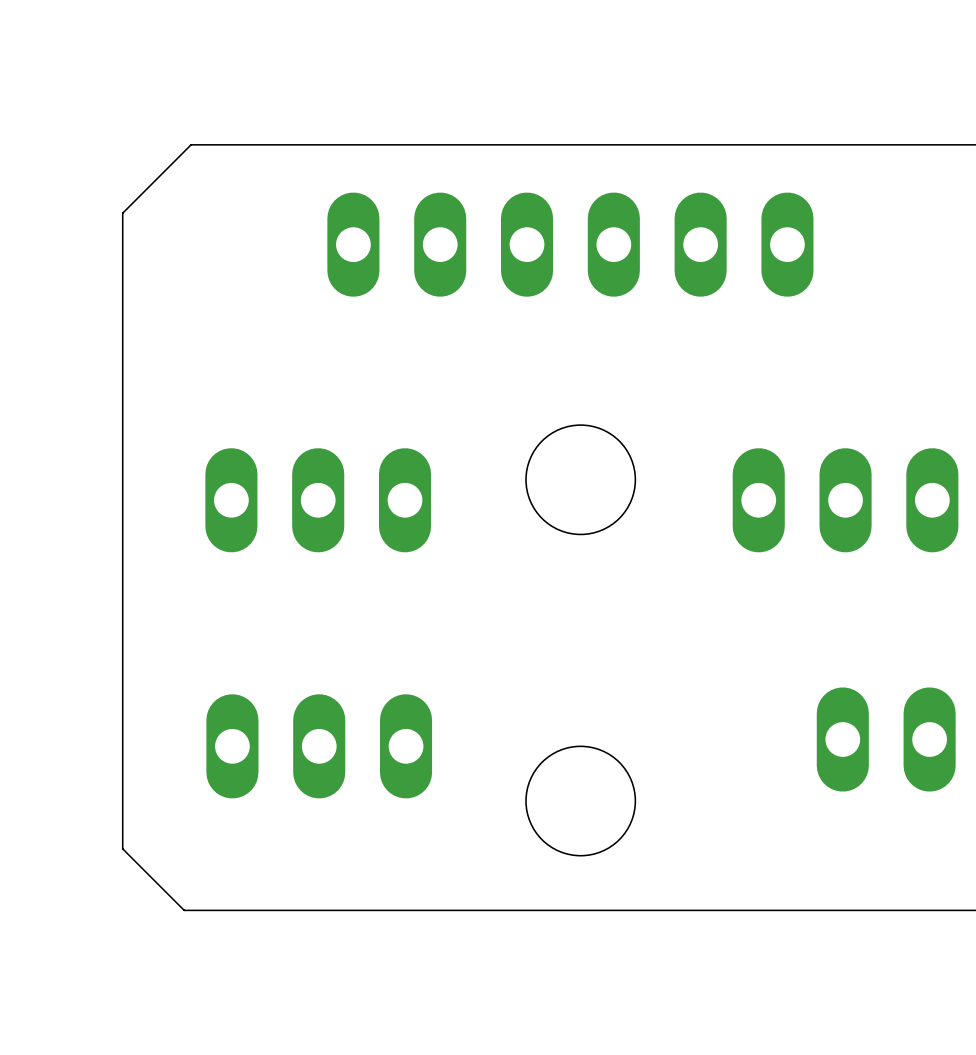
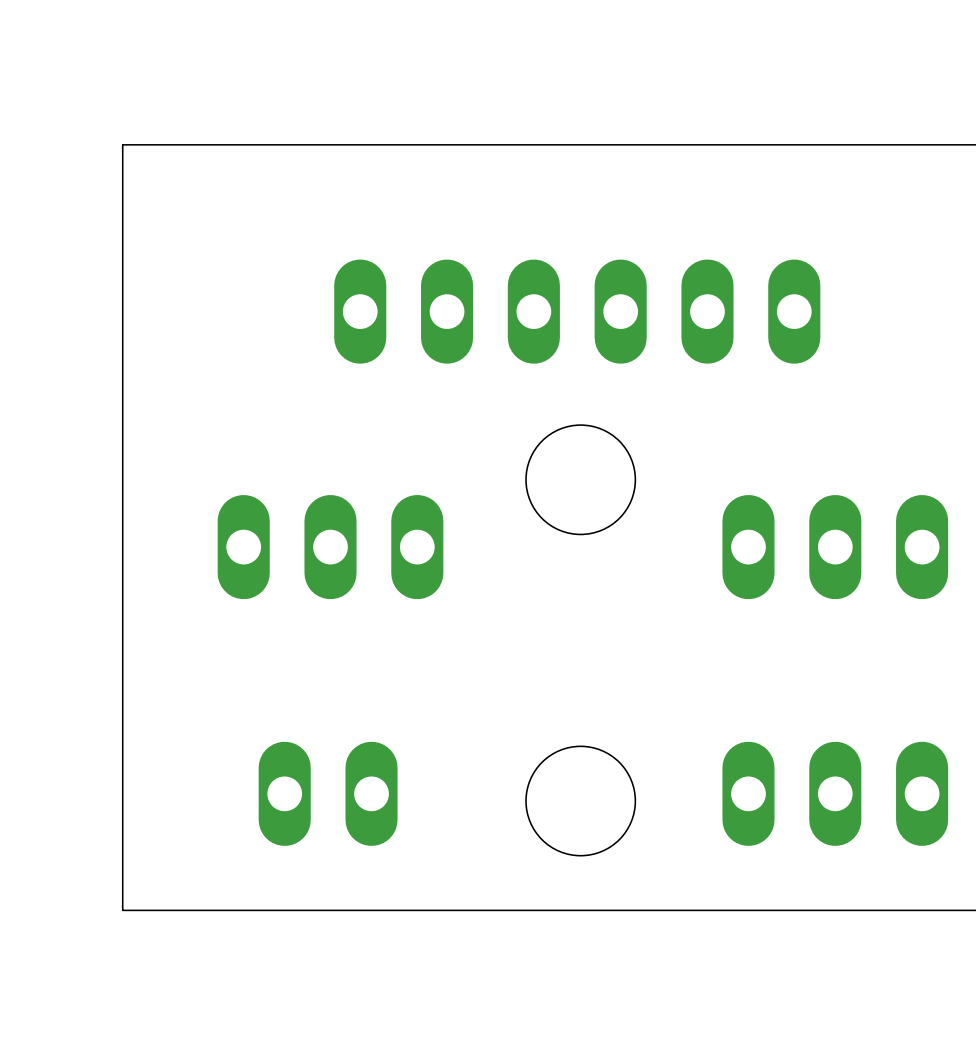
board edge: (191, 144) (122, 213) -> (191, 144) (122, 144) (122, 213)
part position: (570, 244) -> (577, 311)
part position: (318, 500) -> (330, 547)
part position: (845, 500) -> (835, 547)
part position: (886, 739) -> (328, 793)
part: (319, 746) -> none
part: none -> (835, 793)
board edge: (122, 848) (184, 910) -> (122, 848) (122, 910) (184, 910)

